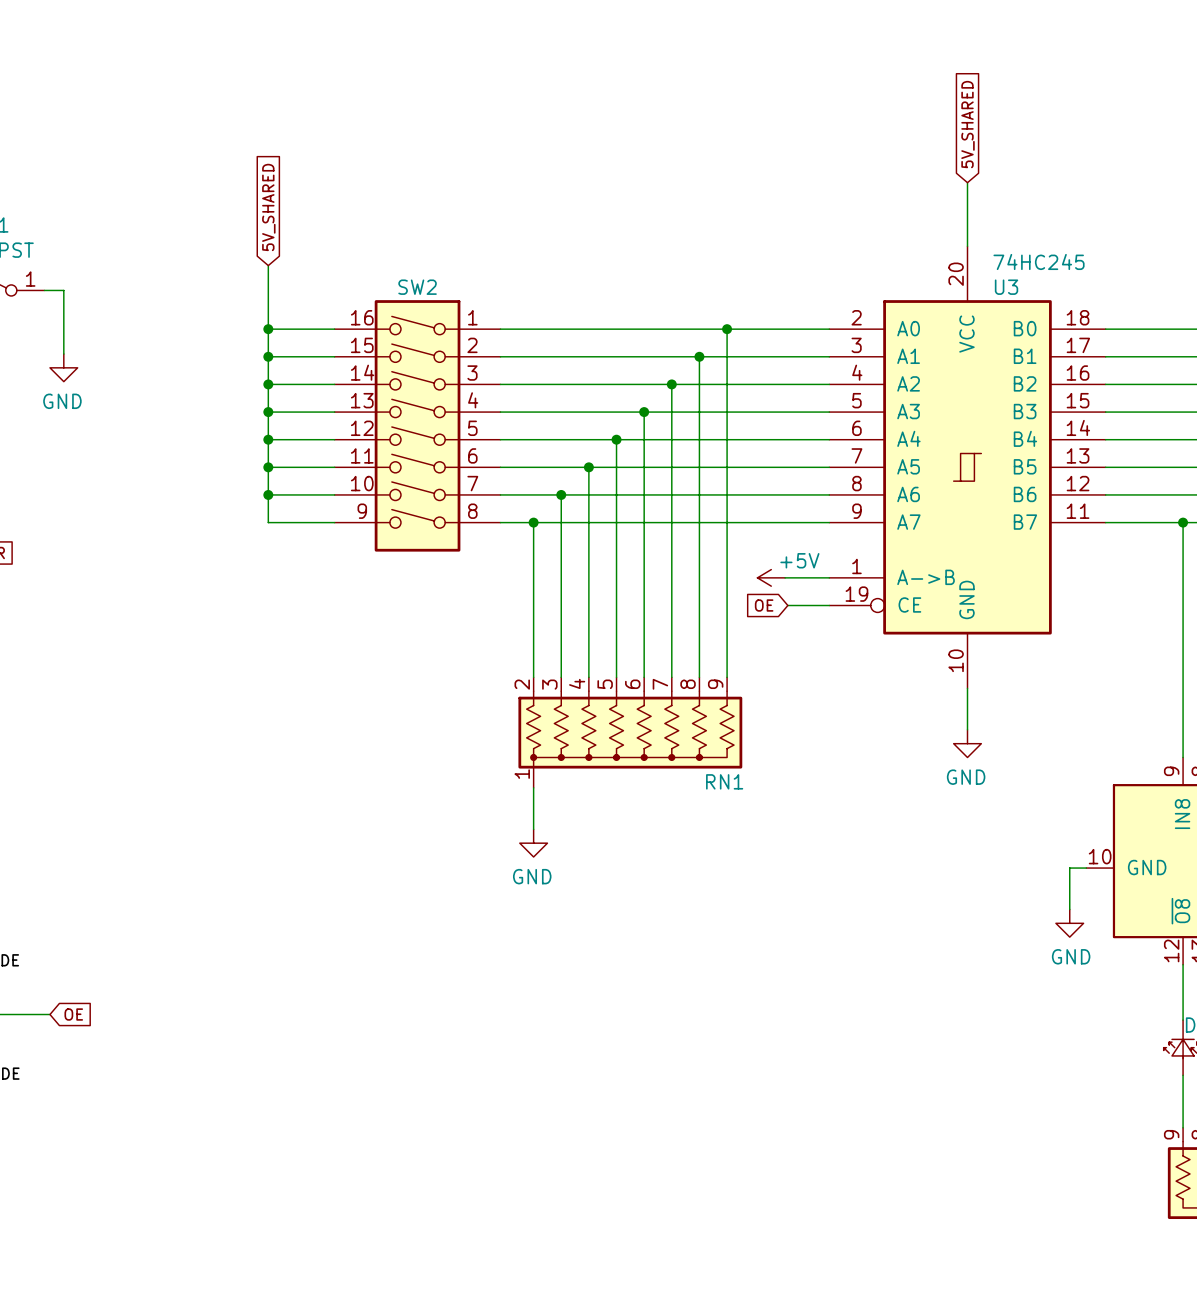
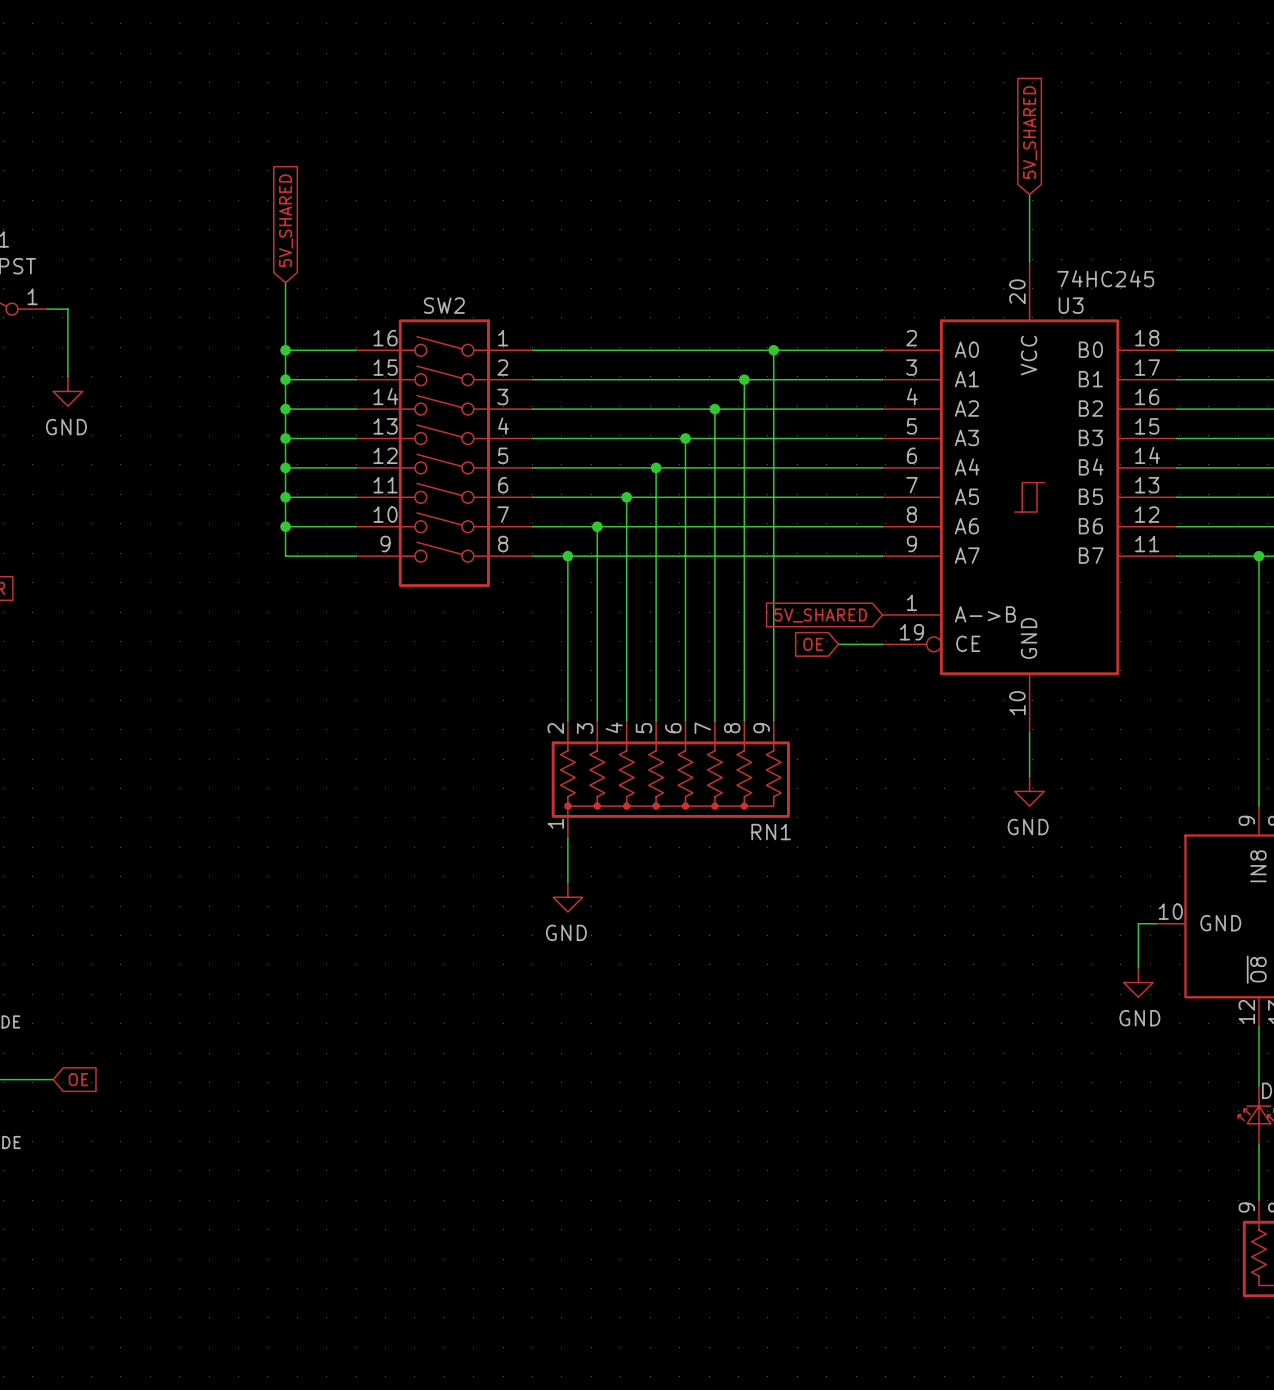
power symbol: +5V (771, 577) -> none
wire: (785, 577) (829, 577) -> none
global label: none -> 5V_SHARED (820, 615)

